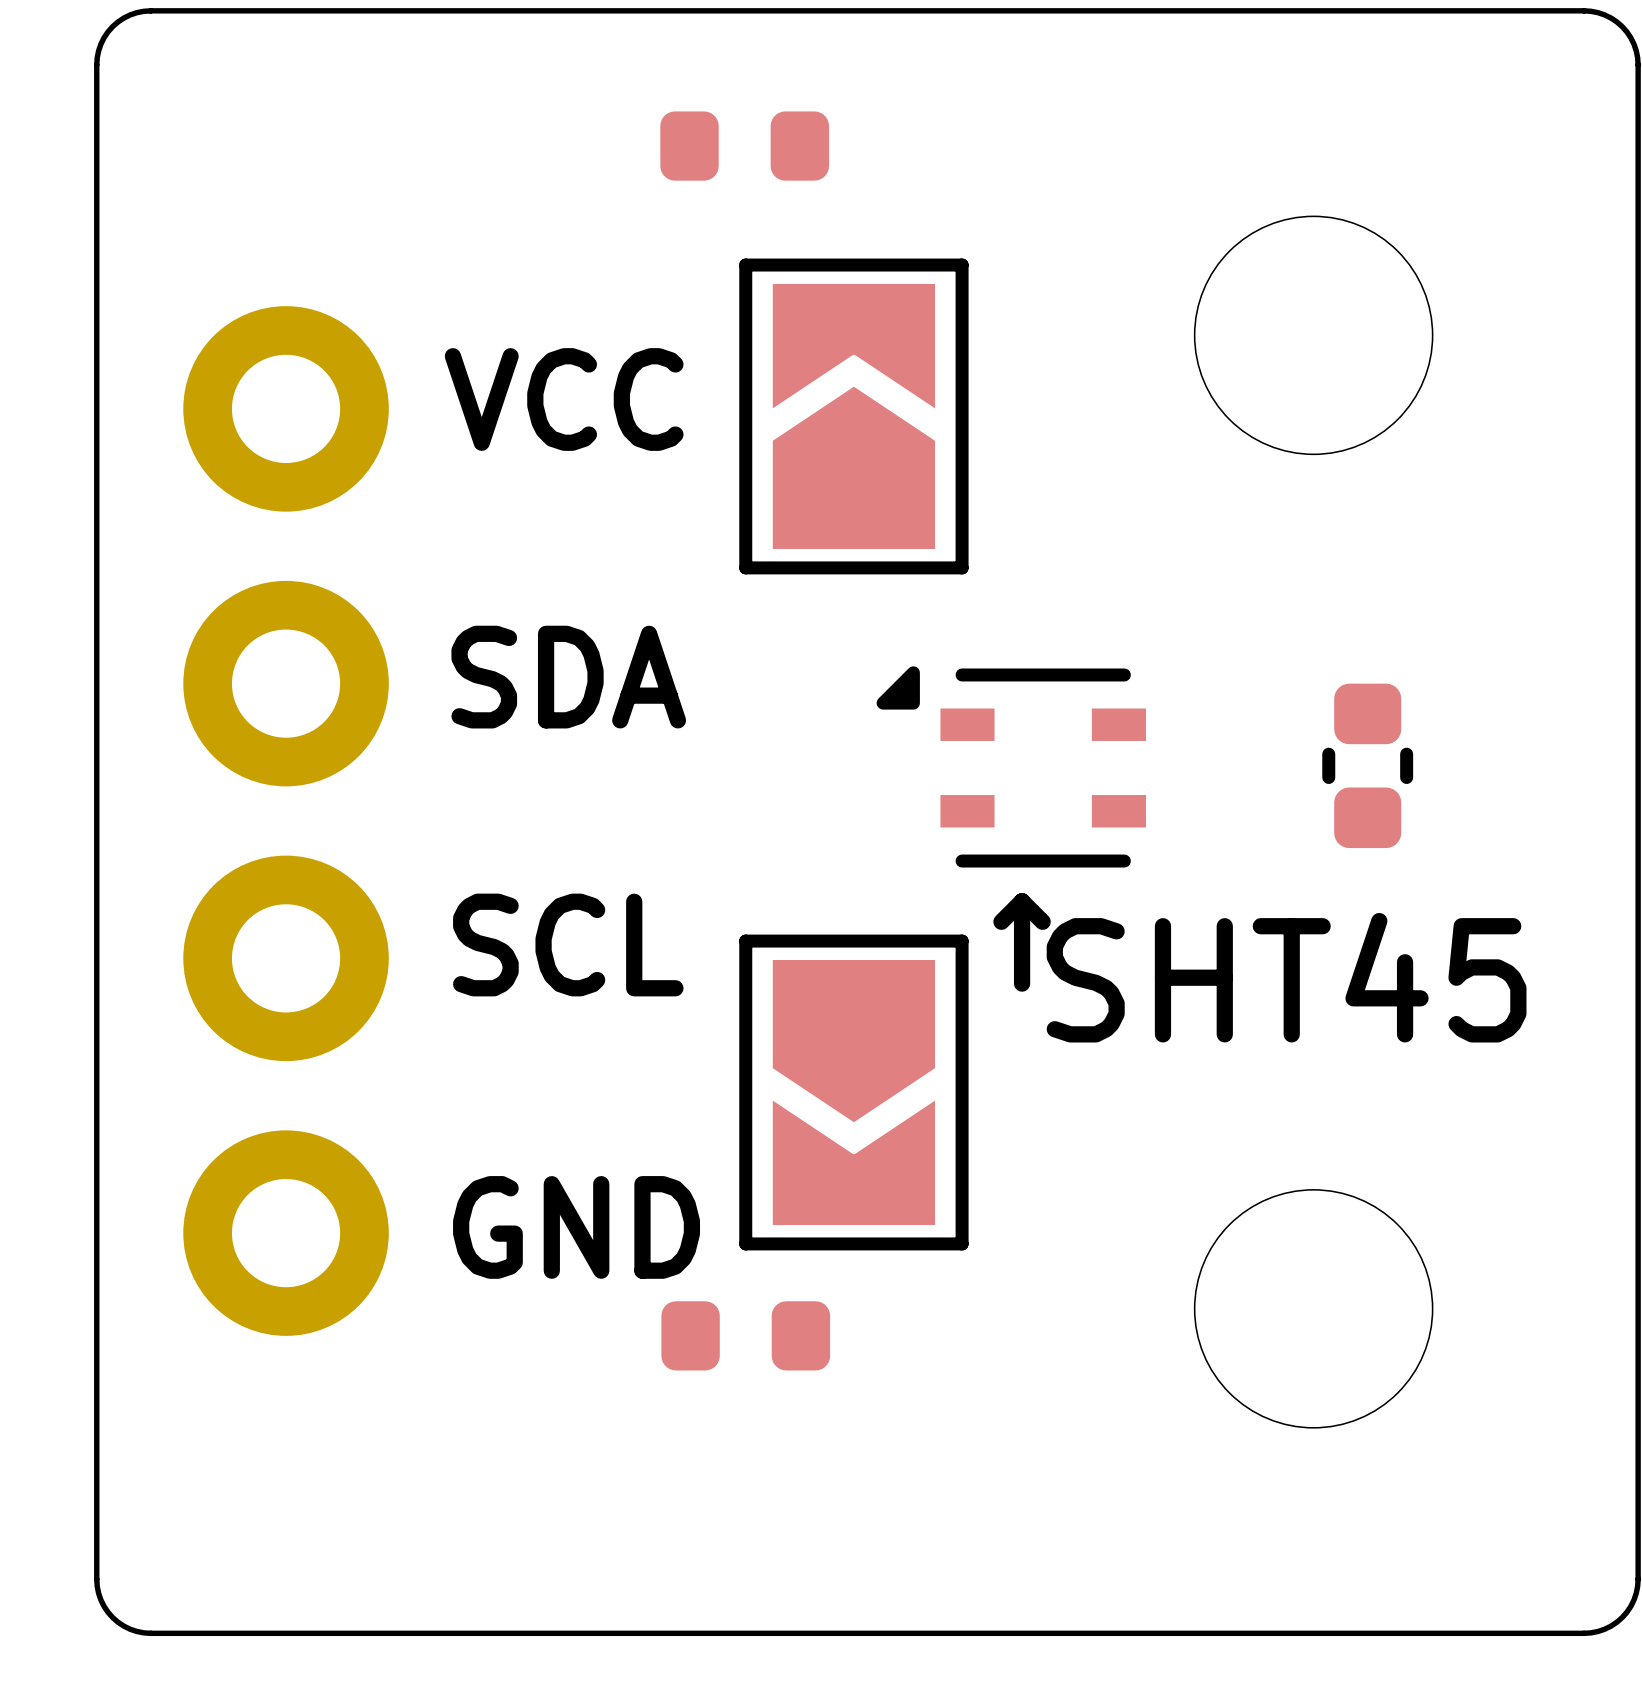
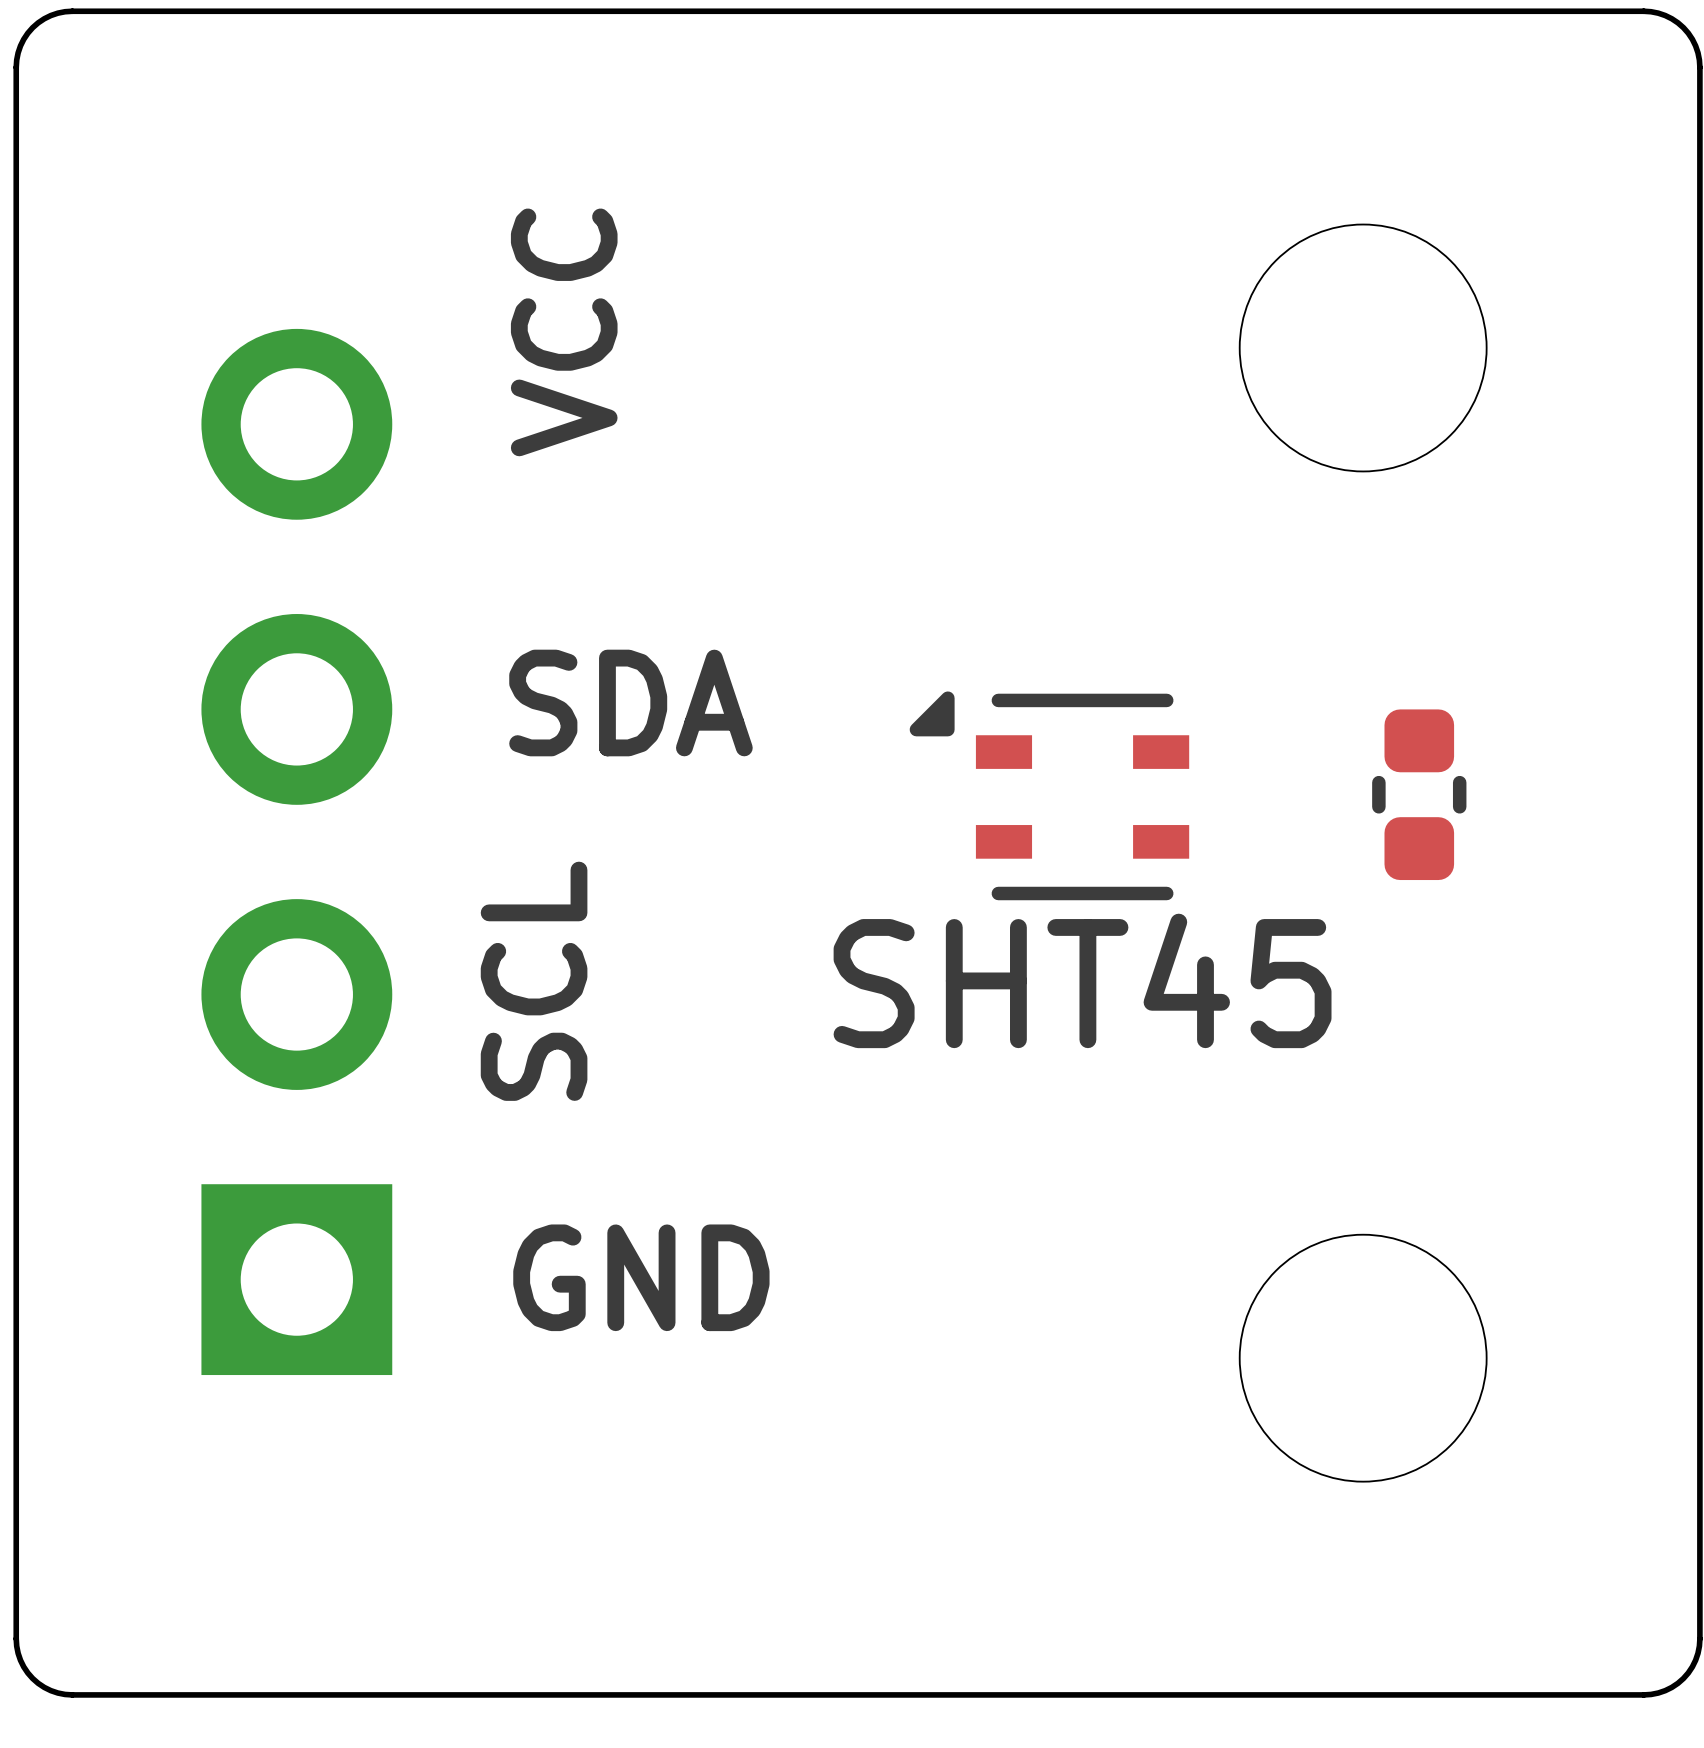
board edge: (150, 10) (130, 14) (112, 26) (100, 44) (96, 64) (96, 1579) (100, 1599) (112, 1617) (130, 1629) (150, 1633) -> (156, 11) (72, 11) (50, 15) (32, 27) (23, 39) (18, 52) (16, 67) (16, 1646) (20, 1660) (27, 1672) (38, 1683) (50, 1690) (72, 1694) (156, 1694)
part: (744, 146) -> none
part footprint: [183, 306, 389, 1336] -> [201, 328, 393, 1376]
text rotation: 0° (564, 399) -> 90° counterclockwise (564, 332)
part: (853, 416) -> none
text position: SDA (568, 677) -> SDA (630, 702)
text: ↑ (1022, 942) -> none
text rotation: 0° (568, 945) -> 90° counterclockwise (534, 981)
part value position: SHT45 (1286, 977) -> SHT45 (1082, 980)
part: (853, 1092) -> none
text position: GND (576, 1227) -> GND (641, 1277)
part: (745, 1335) -> none

